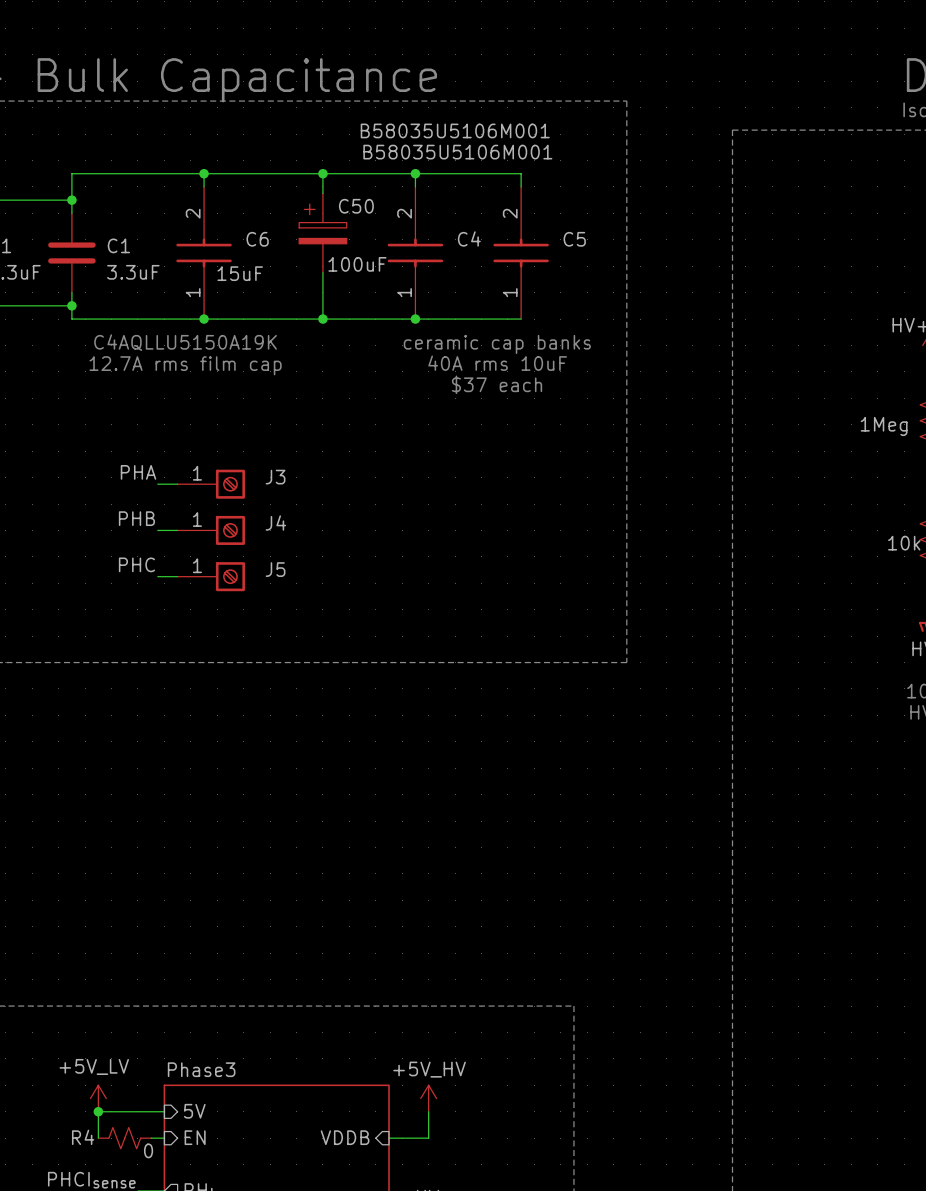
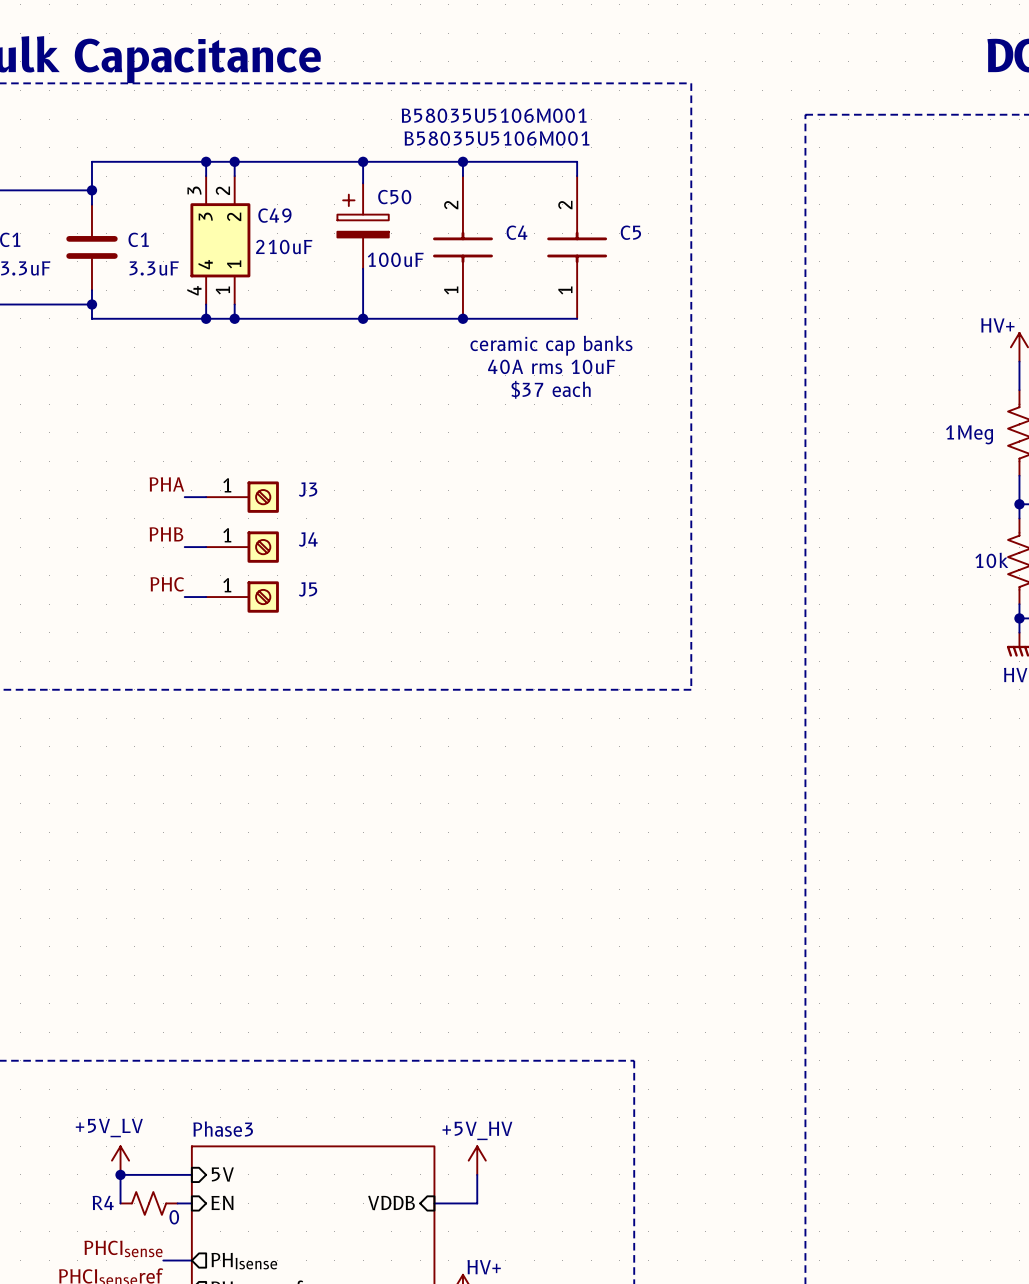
wire: none -> (206, 161) (206, 176)
junction: none -> (206, 161)
C49: none -> 210uF (220, 240)
C6: 15uF (204, 252) -> none
wire: none -> (206, 304) (206, 318)
junction: none -> (206, 318)
text: C4AQLLU5150A19K (185, 342) -> none
text: 12.7A rms film cap (185, 365) -> none

